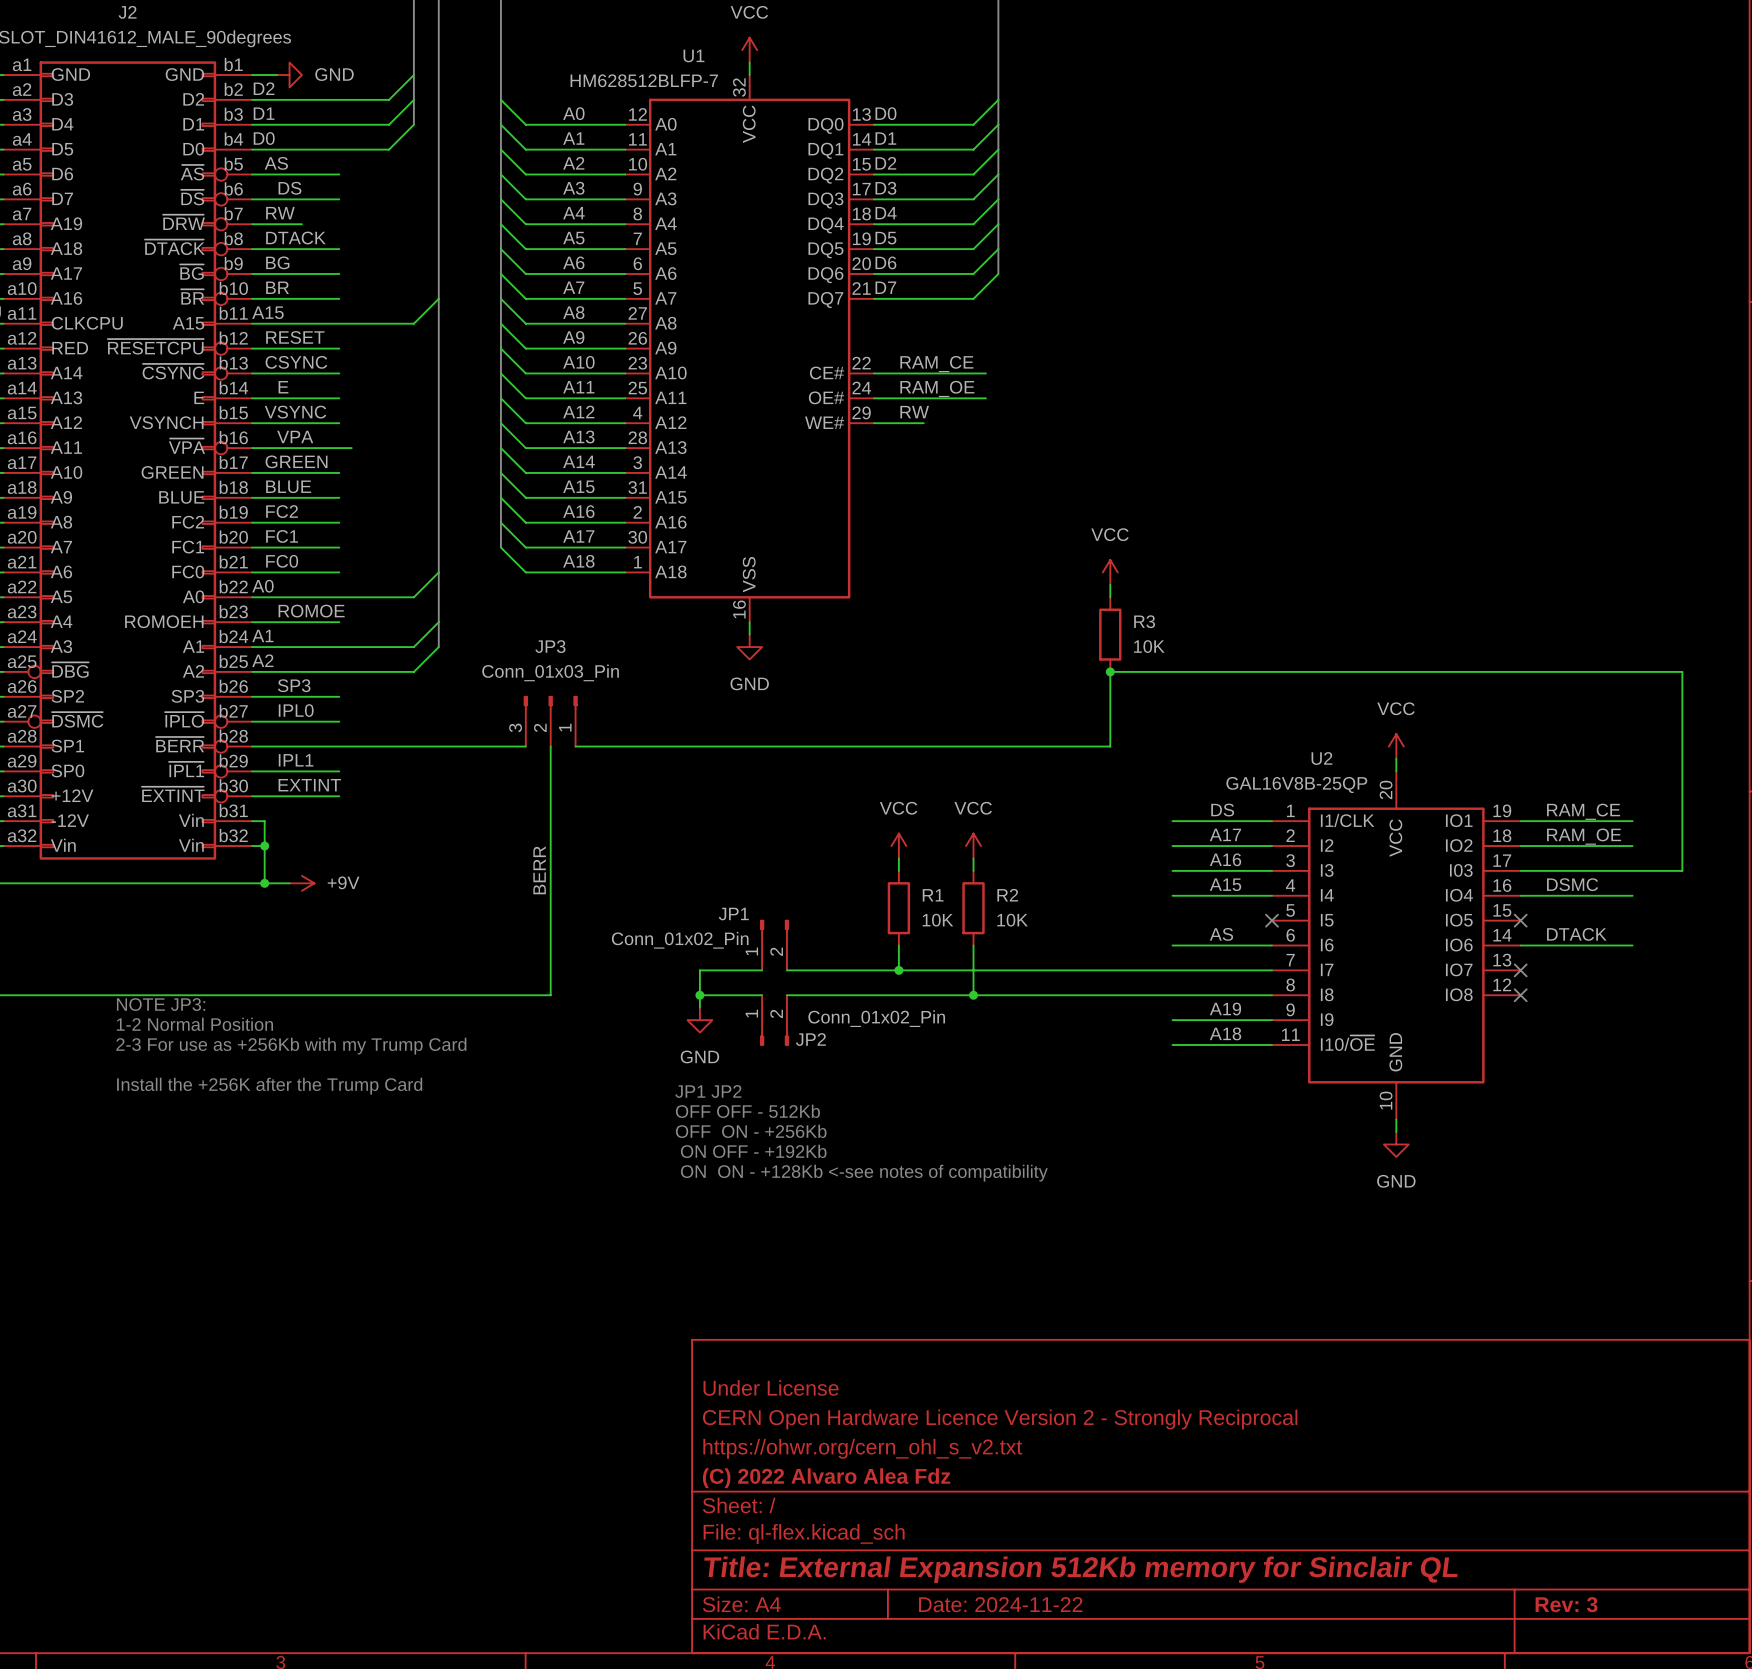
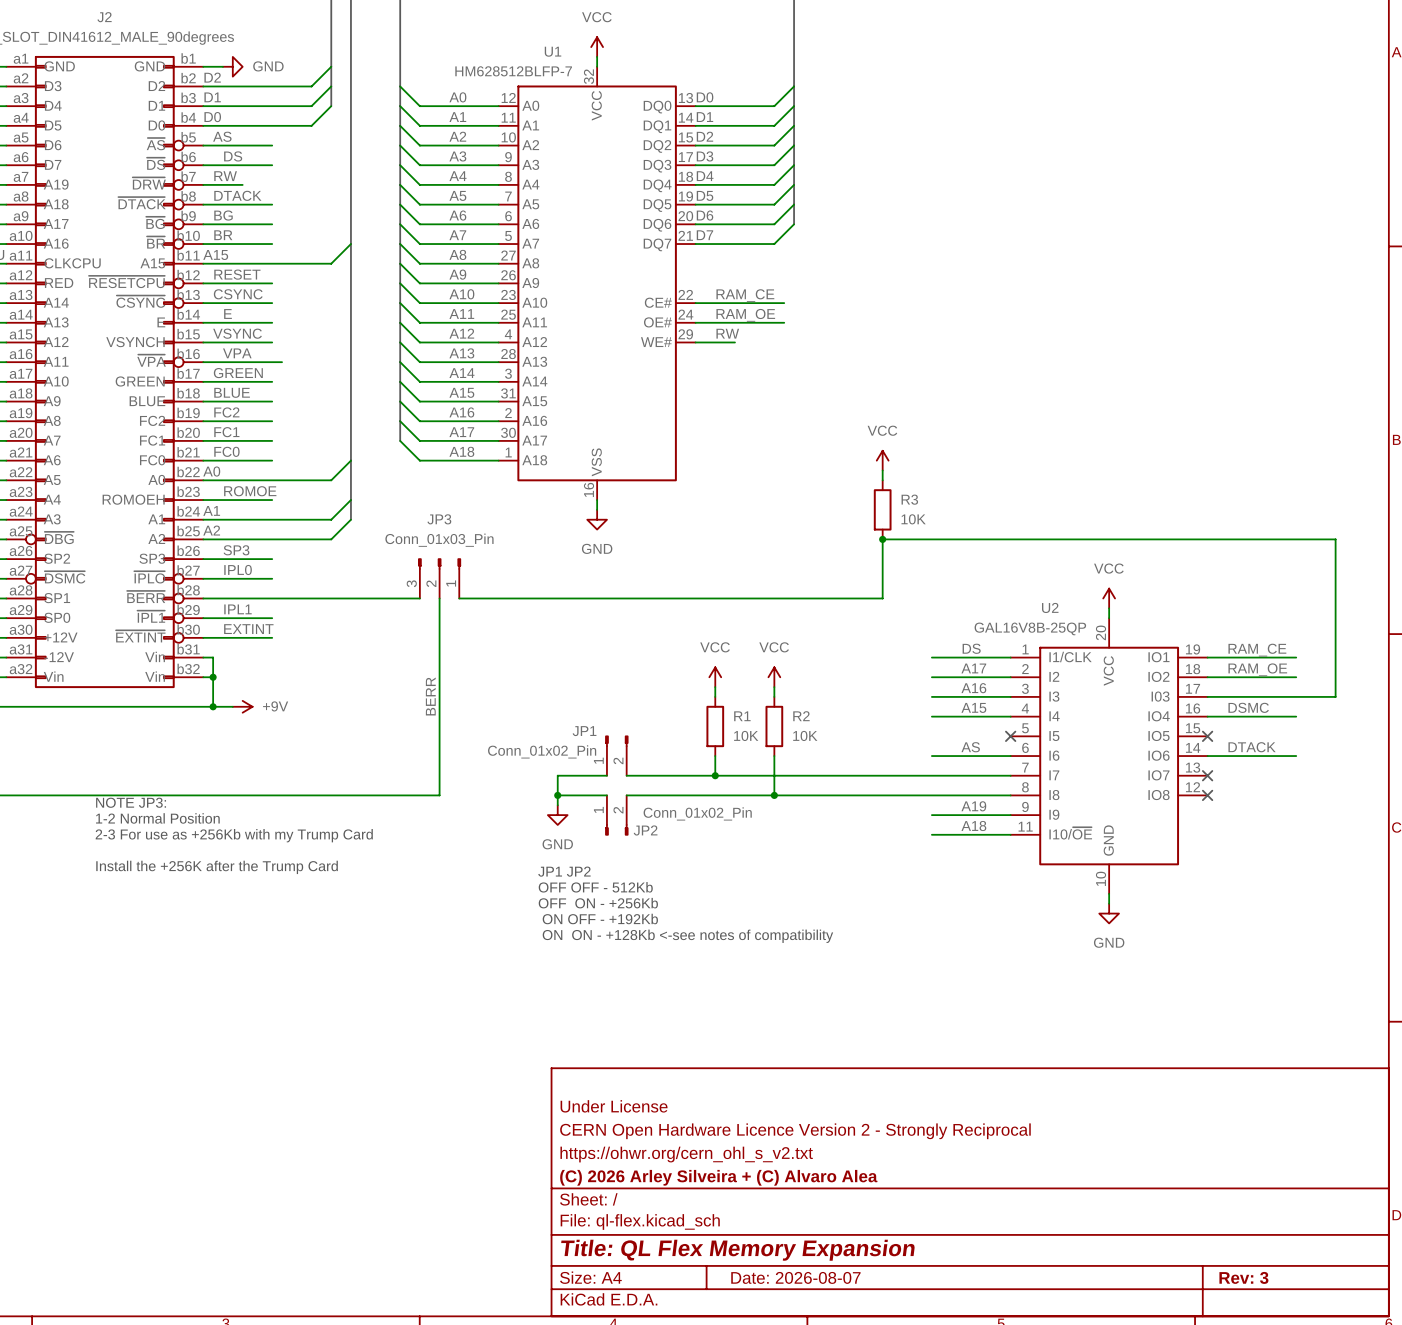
title block: (C) 2022 Alvaro Alea Fdz (826, 1478) -> (C) 2026 Arley Silveira + (C) Alvaro Alea (718, 1177)
title block: Title: External Expansion 512Kb memory for Sinclair QL (1080, 1569) -> Title: QL Flex Memory Expansion (737, 1250)
title block: Date: 2024-11-22 (1000, 1604) -> Date: 2026-08-07 (795, 1277)

